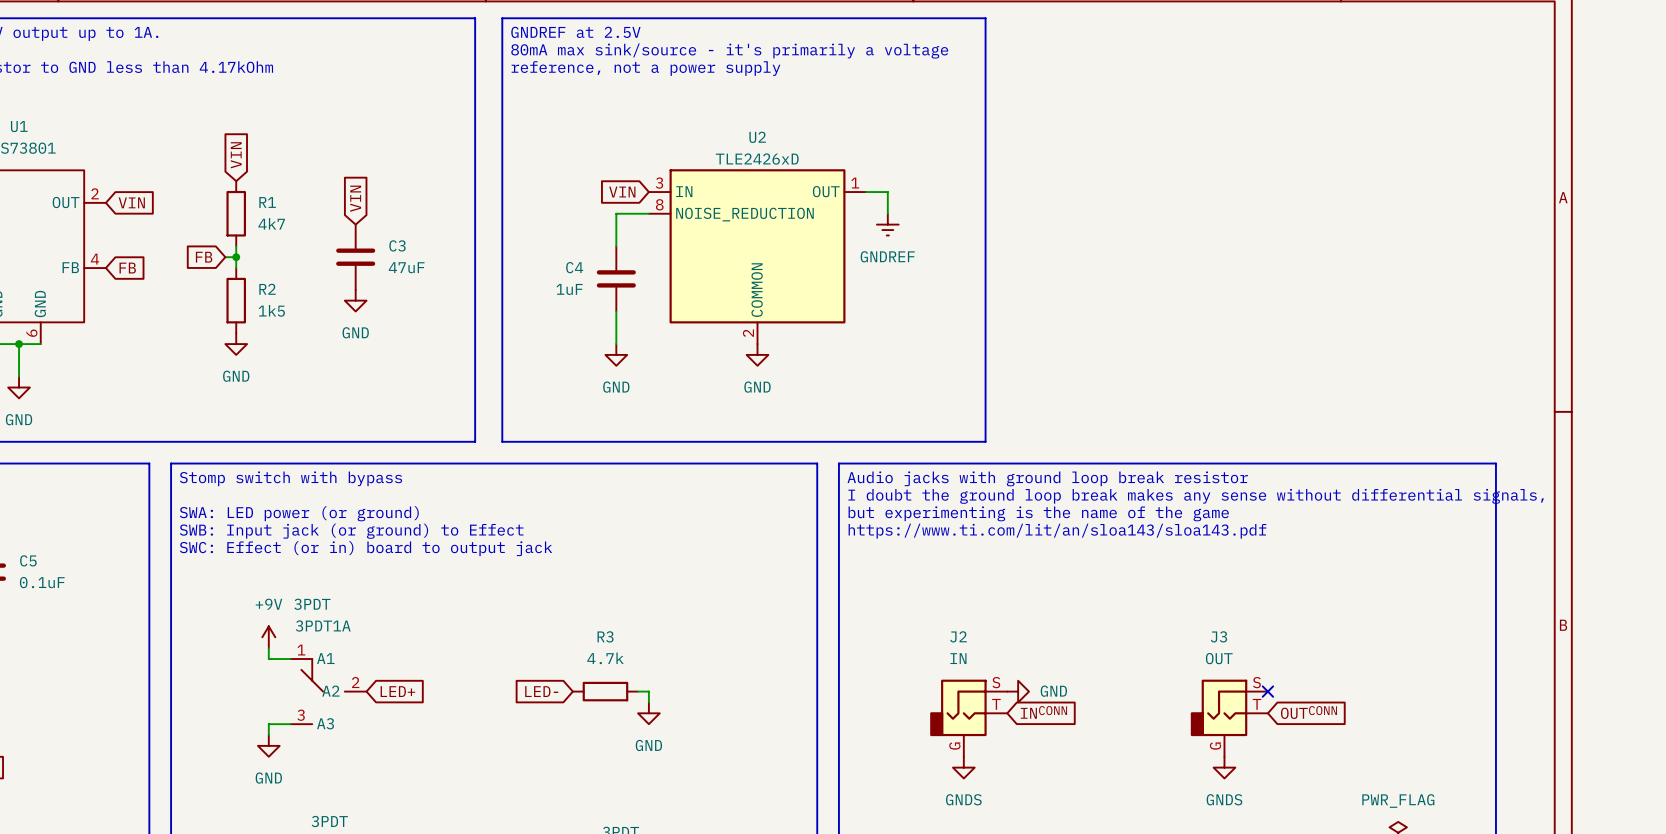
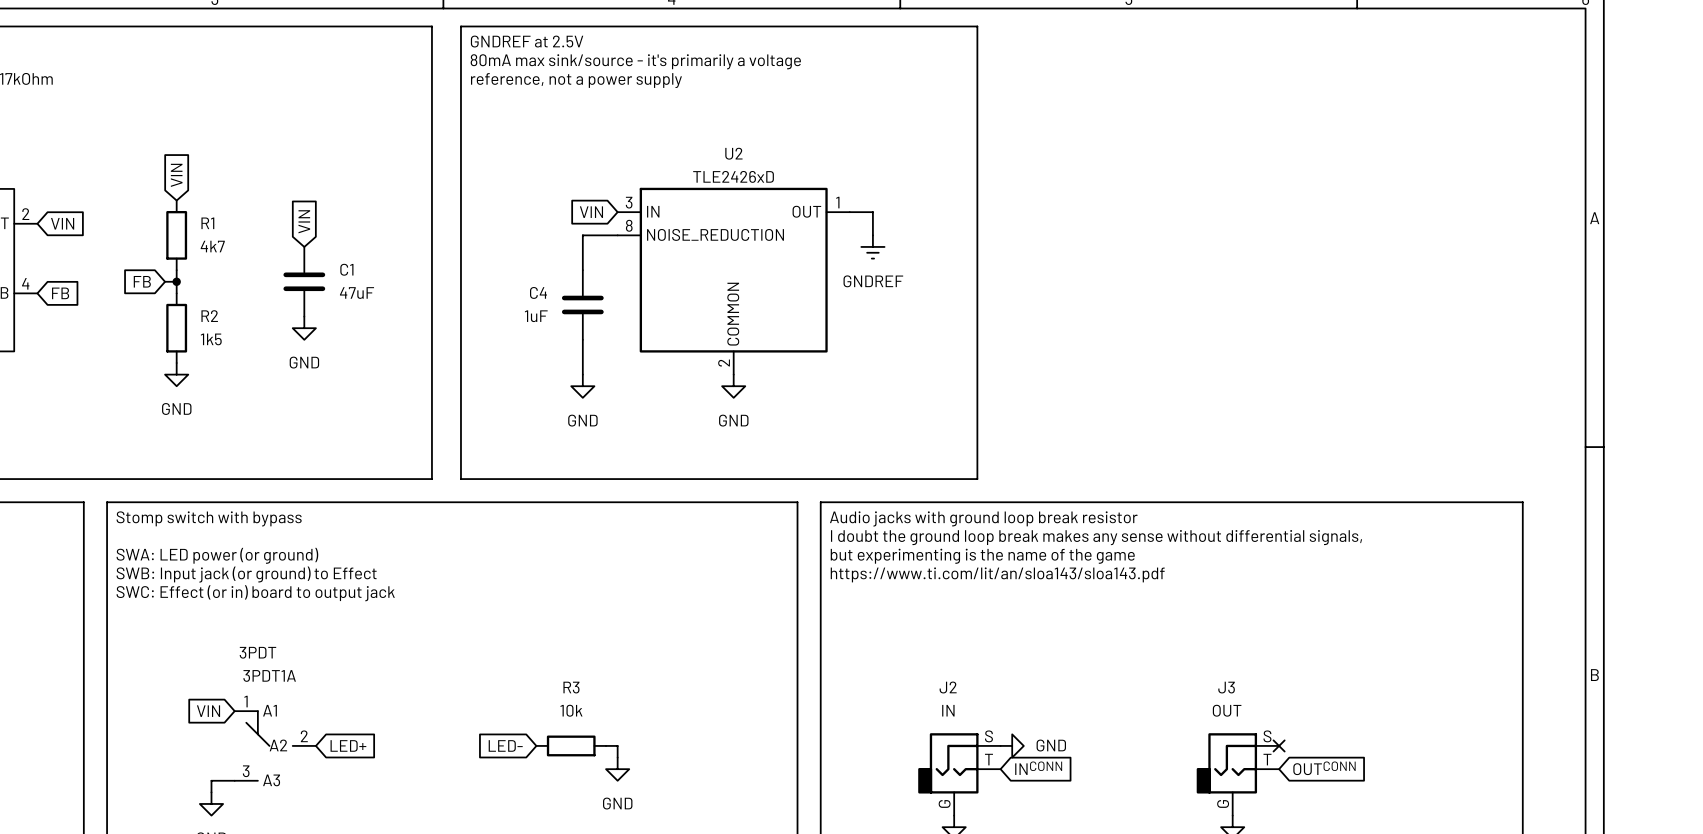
C3 name: C3 (397, 245) -> C1 (346, 269)
power symbol: +9V (268, 637) -> none
wire: (268, 648) (268, 659) (290, 659) -> none
R3 value: 4.7k (605, 658) -> 10k (571, 710)
global label: none -> VIN (208, 711)

